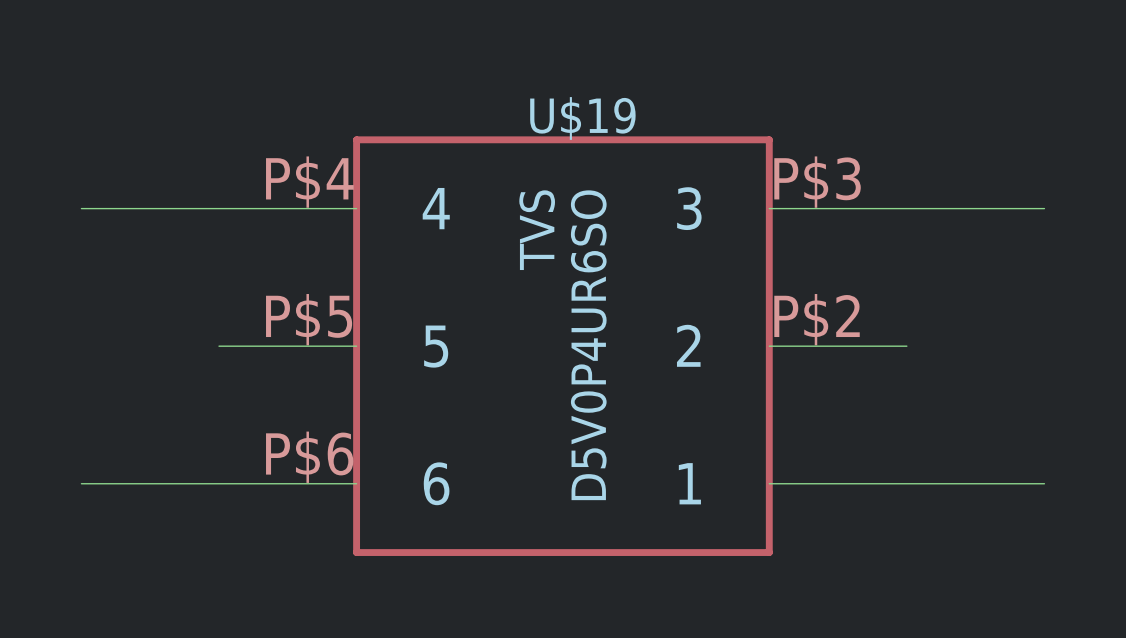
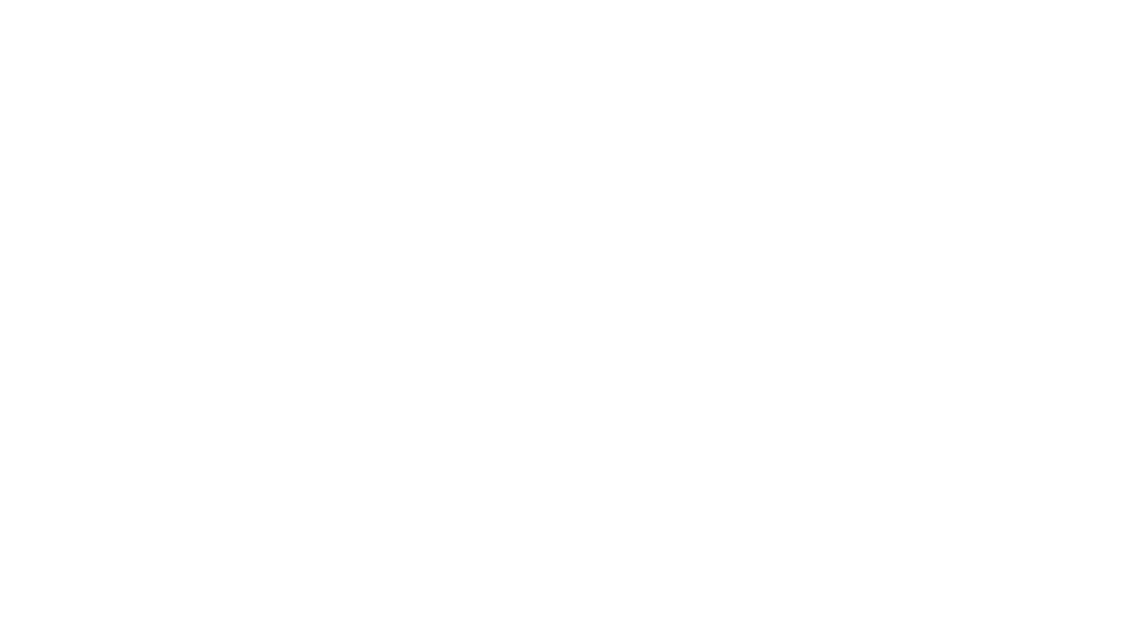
wire: (81, 208) (356, 208) -> none
wire: (769, 208) (1044, 208) -> none
wire: (219, 346) (356, 346) -> none
U$19: (562, 346) -> none
wire: (769, 346) (906, 346) -> none
wire: (81, 483) (356, 483) -> none
wire: (769, 483) (1044, 483) -> none

